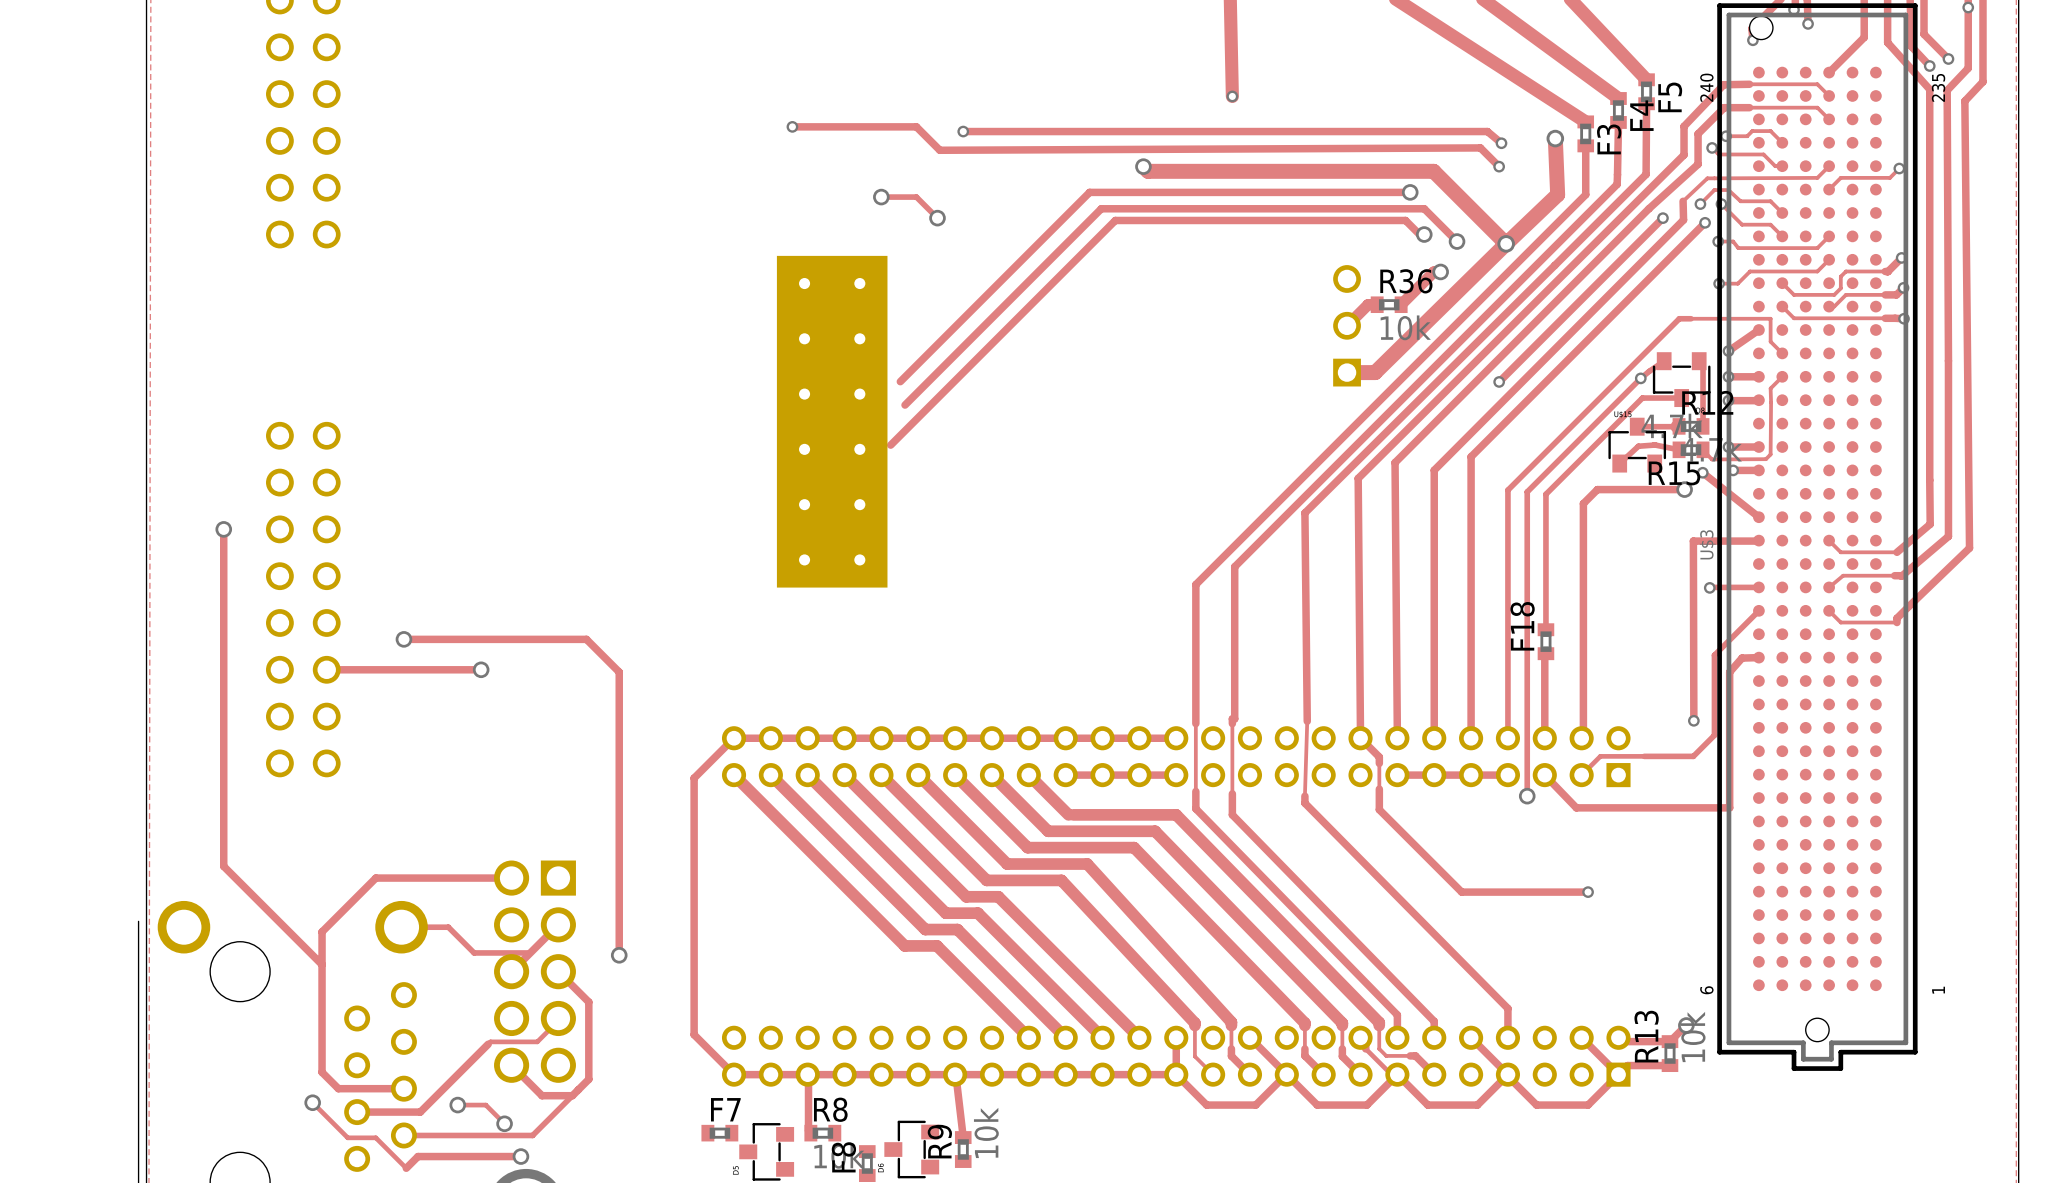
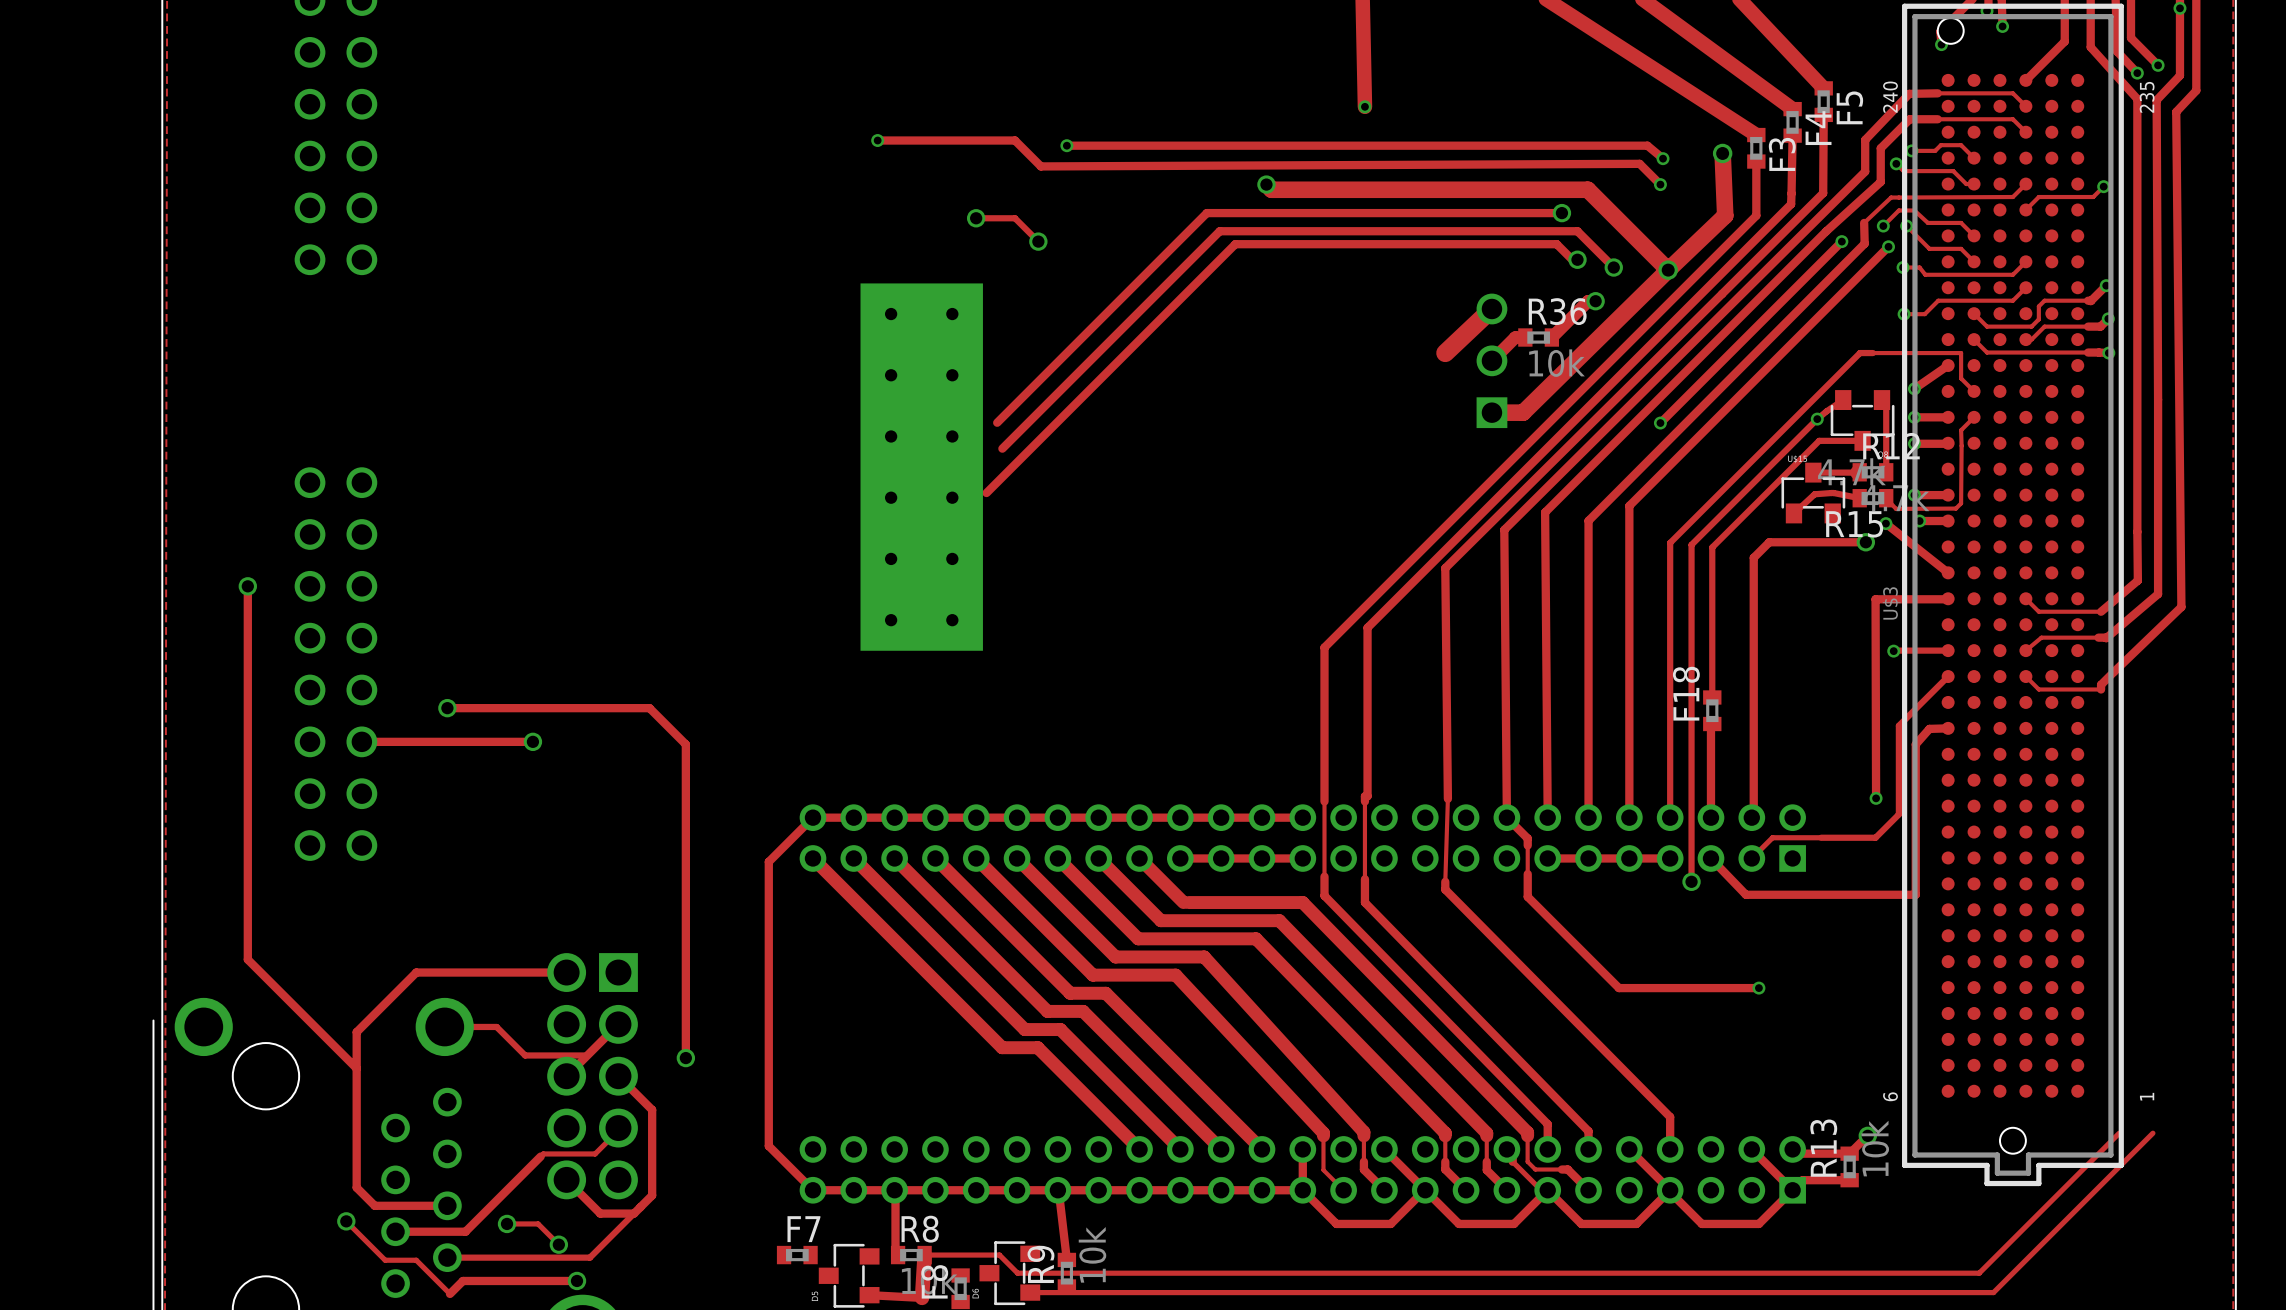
track: none -> (1491, 308) (1445, 353)
track: none -> (2119, 1133) (1979, 1273) (1017, 1273) (999, 1255) (924, 1255) (922, 1297) (869, 1295)
track: none -> (2152, 1133) (1993, 1292) (1030, 1292)

